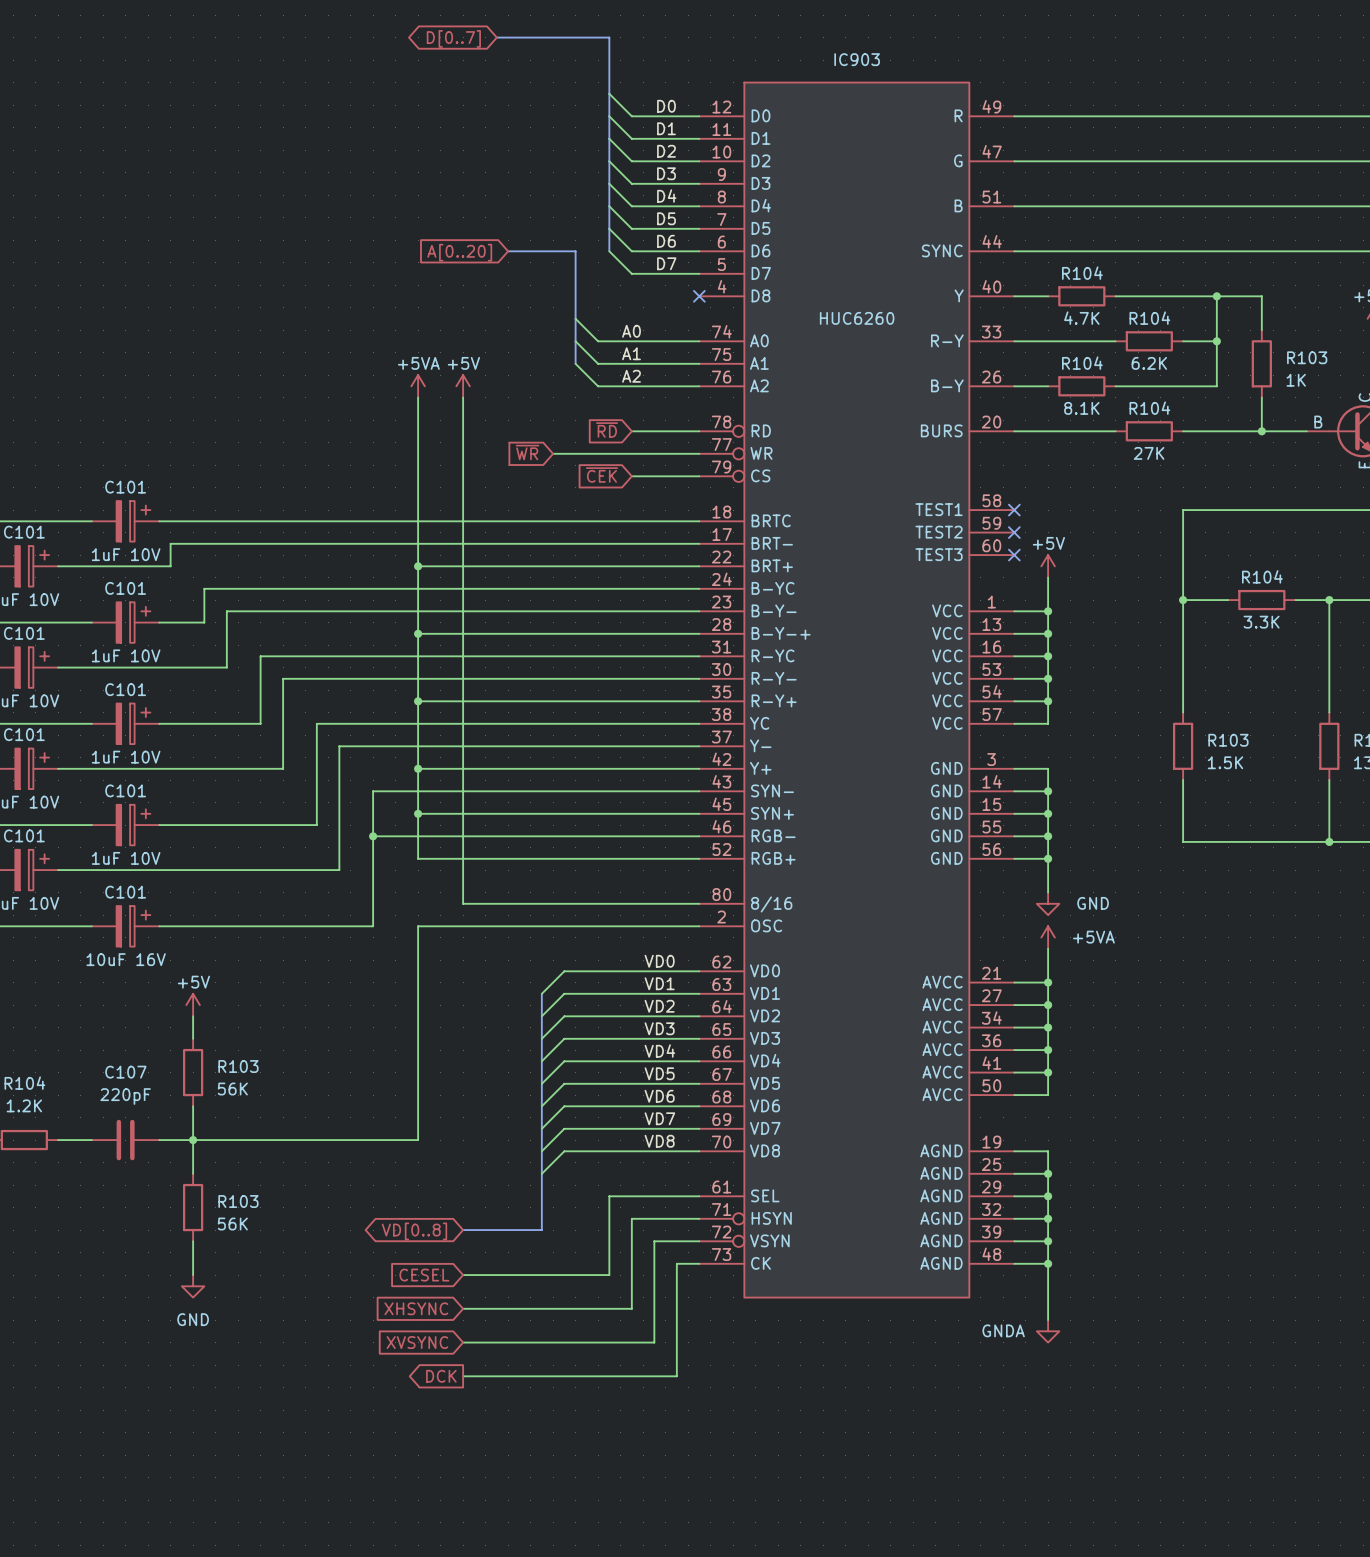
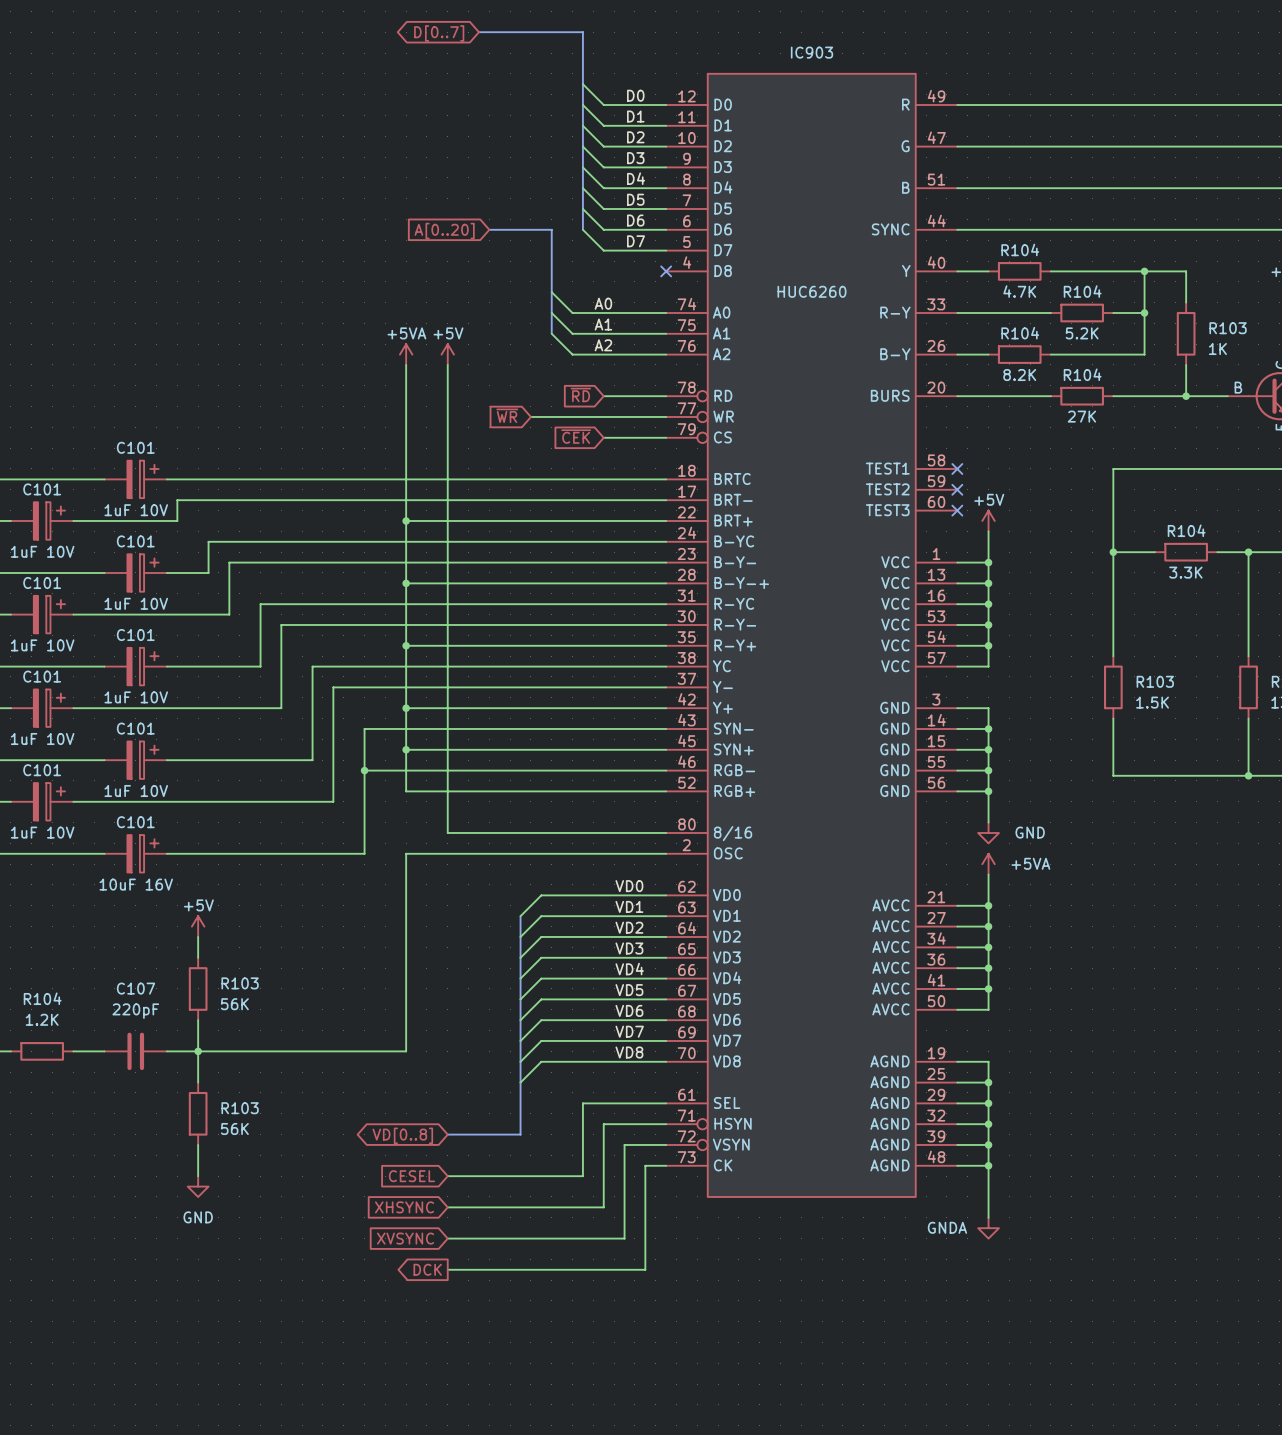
R104 value: 6.2K (1149, 363) -> 5.2K (1082, 333)
R104 value: 8.1K (1081, 408) -> 8.2K (1019, 375)

